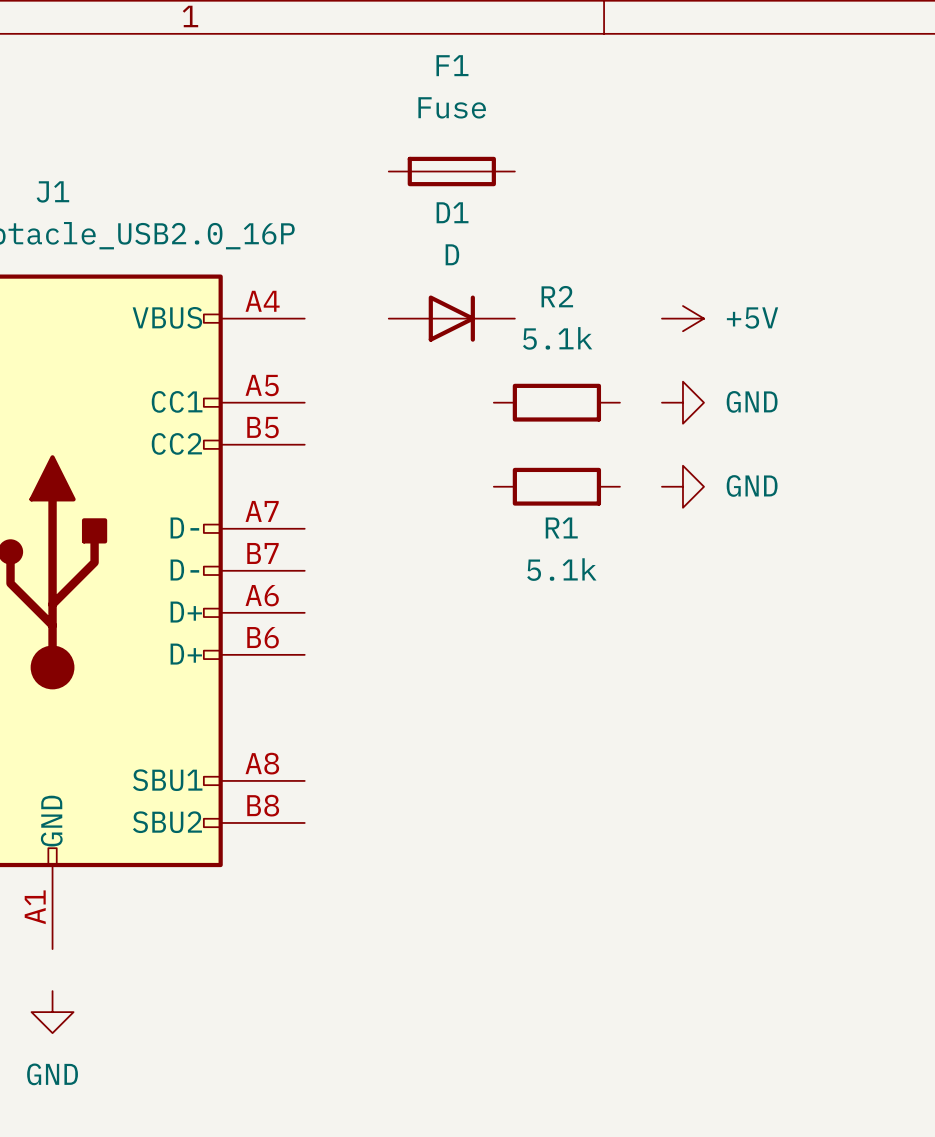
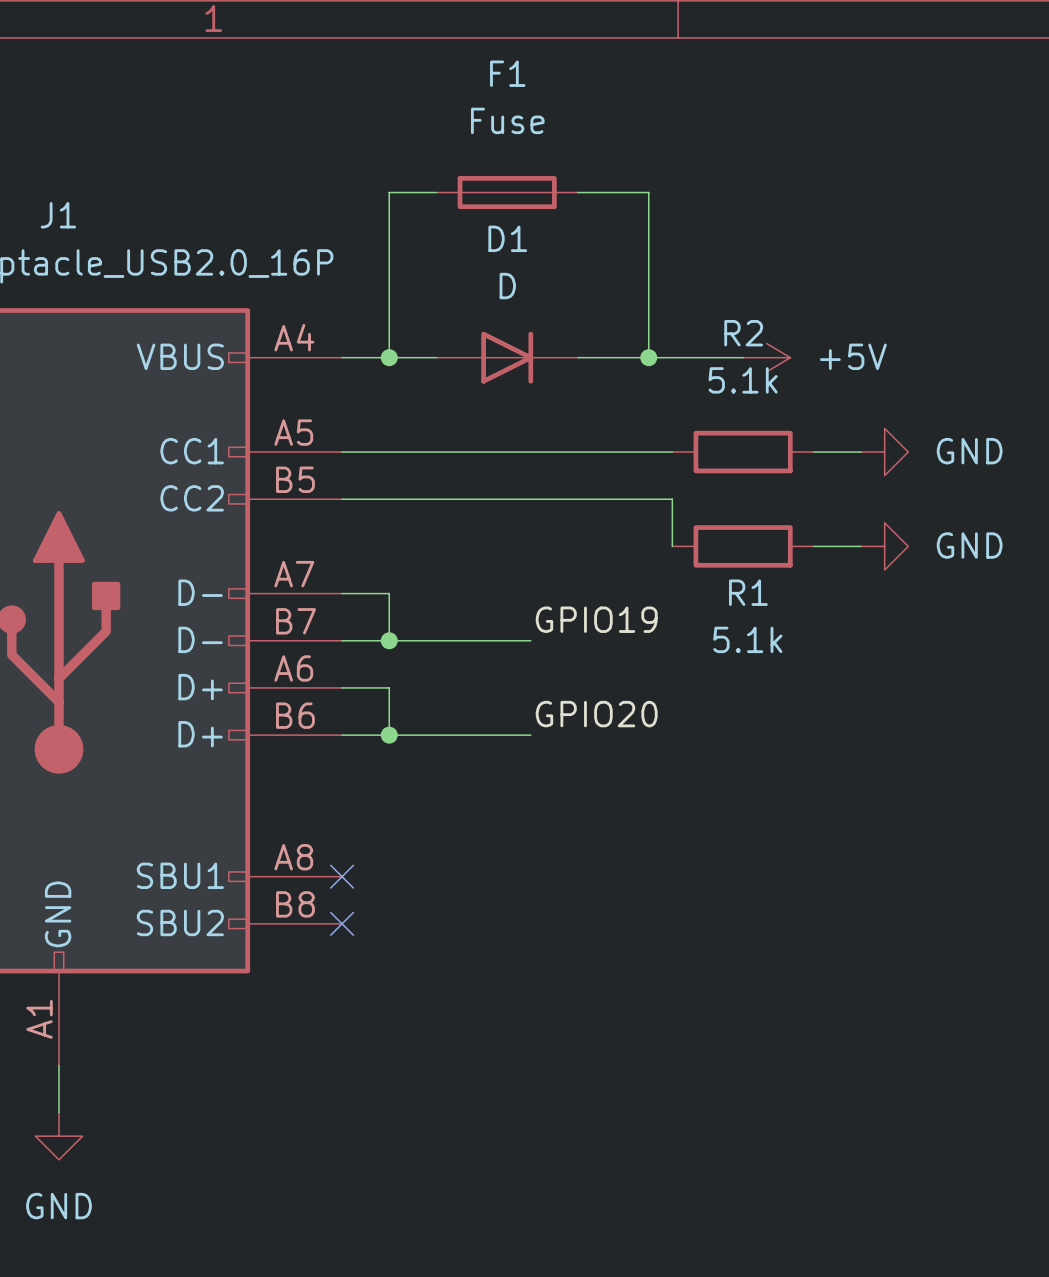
wire: none -> (436, 192) (389, 192) (389, 357)
wire: none -> (577, 192) (648, 192) (648, 357)
wire: none -> (342, 357) (436, 357)
junction: none -> (389, 357)
wire: none -> (577, 357) (743, 357)
junction: none -> (648, 357)
wire: none -> (342, 452) (672, 452)
R2 position: (556, 402) -> (743, 452)
power symbol: GND (682, 402) -> none
wire: none -> (813, 452) (861, 452)
power symbol: none -> GND (884, 452)
wire: none -> (342, 499) (672, 499) (672, 546)
R1 position: (556, 486) -> (743, 546)
power symbol: GND (682, 486) -> none
wire: none -> (813, 546) (861, 546)
power symbol: none -> GND (884, 546)
wire: none -> (342, 593) (389, 593) (389, 640)
label: none -> GPIO19 (596, 619)
wire: none -> (342, 640) (530, 640)
junction: none -> (389, 640)
wire: none -> (342, 687) (389, 687) (389, 735)
label: none -> GPIO20 (596, 714)
wire: none -> (342, 735) (530, 735)
junction: none -> (389, 735)
no-connect mark: none -> (342, 876)
no-connect mark: none -> (342, 923)
wire: none -> (58, 1065) (58, 1112)

